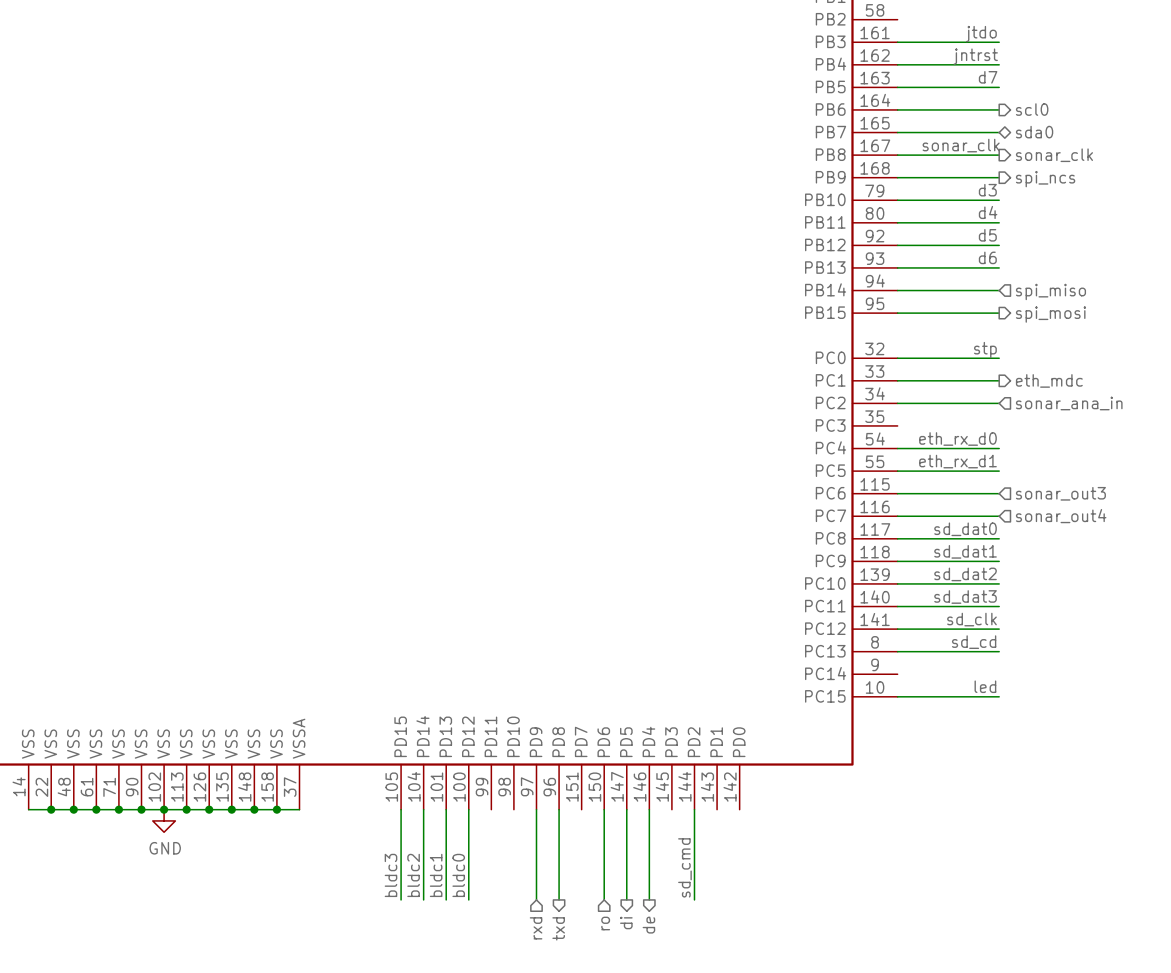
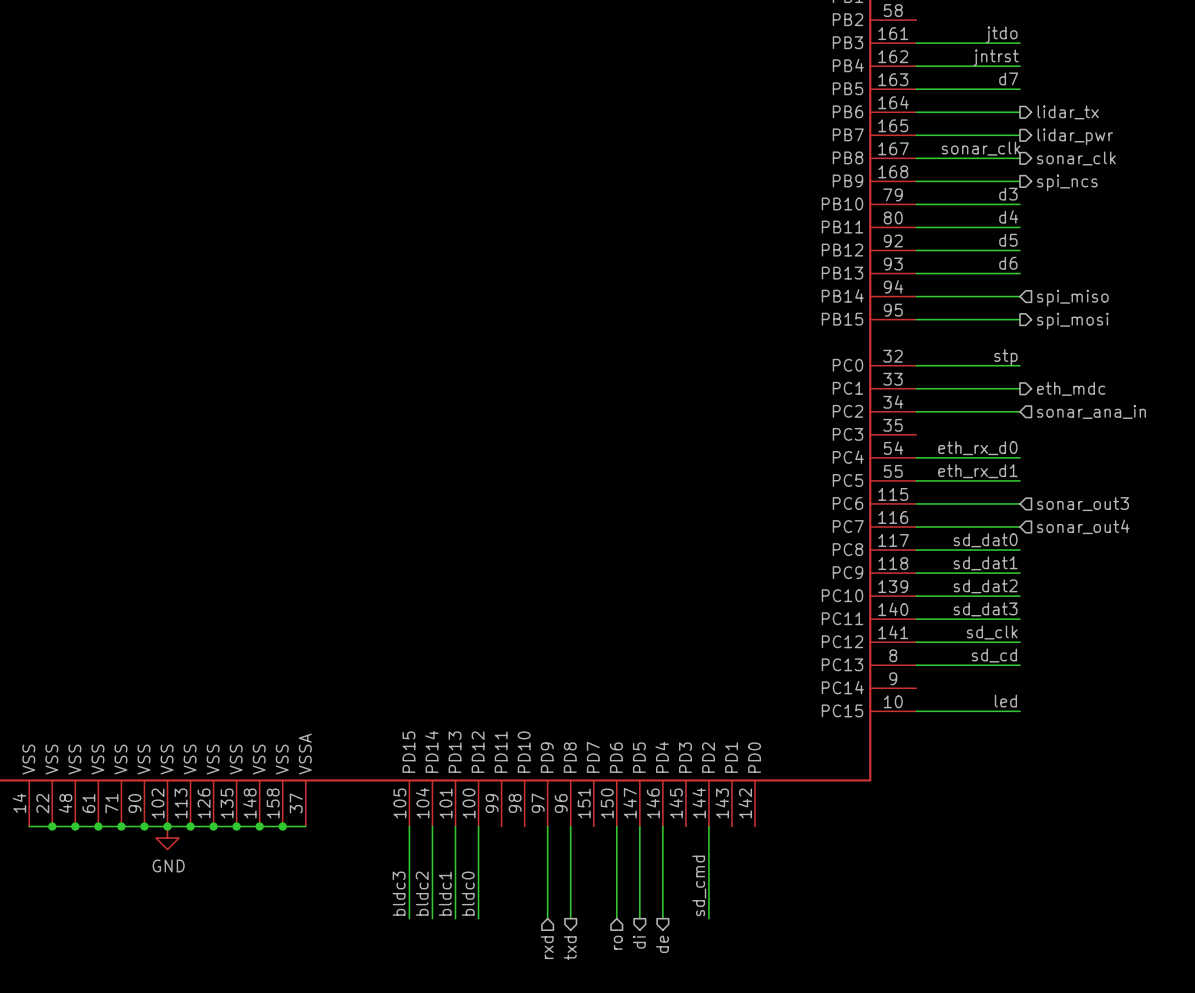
hierarchical label: scl0 (1032, 109) -> lidar_tx (1068, 112)
hierarchical label shape: bidirectional (1034, 132) -> output (1075, 136)
hierarchical label: sda0 (1034, 132) -> lidar_pwr (1075, 136)

